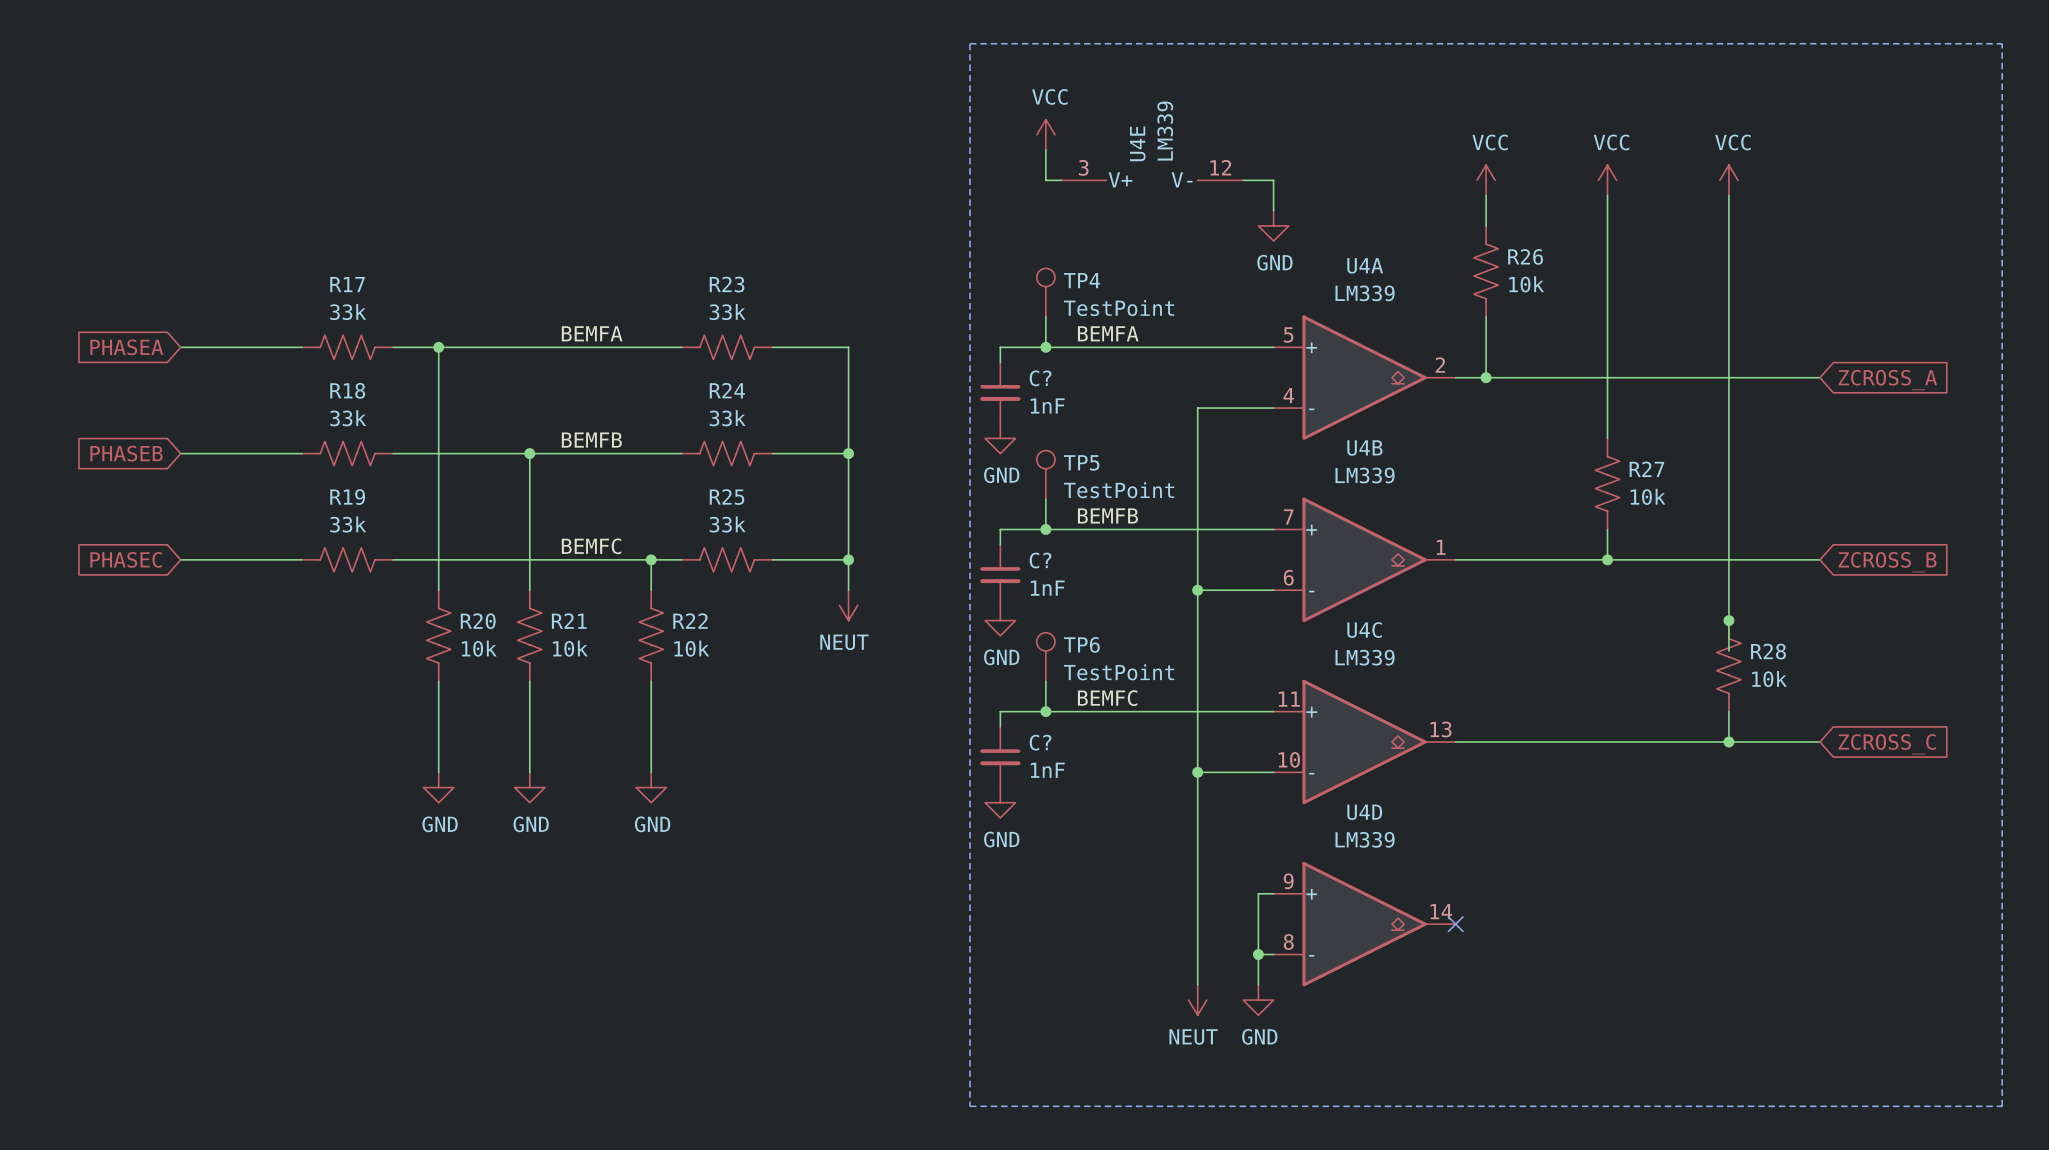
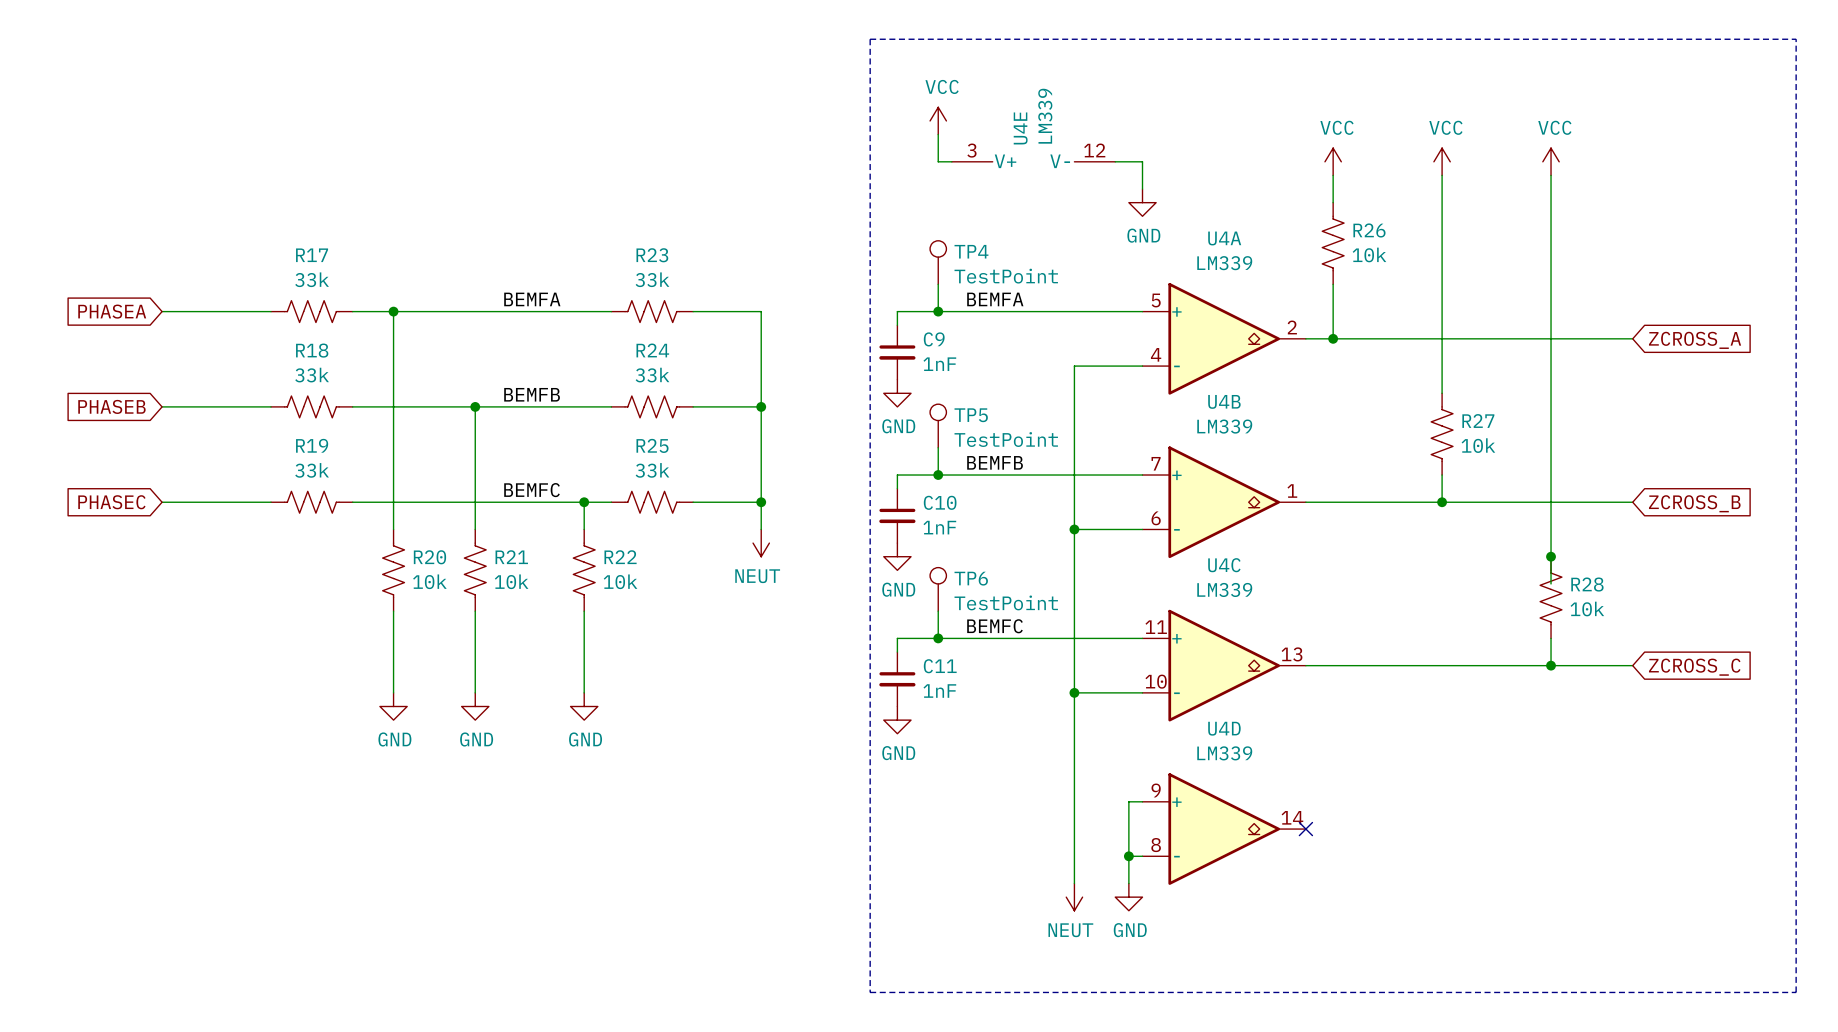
C? name: C? (1040, 378) -> C9 (934, 339)
C? name: C? (1040, 560) -> C10 (940, 502)
C? name: C? (1040, 742) -> C11 (940, 666)

